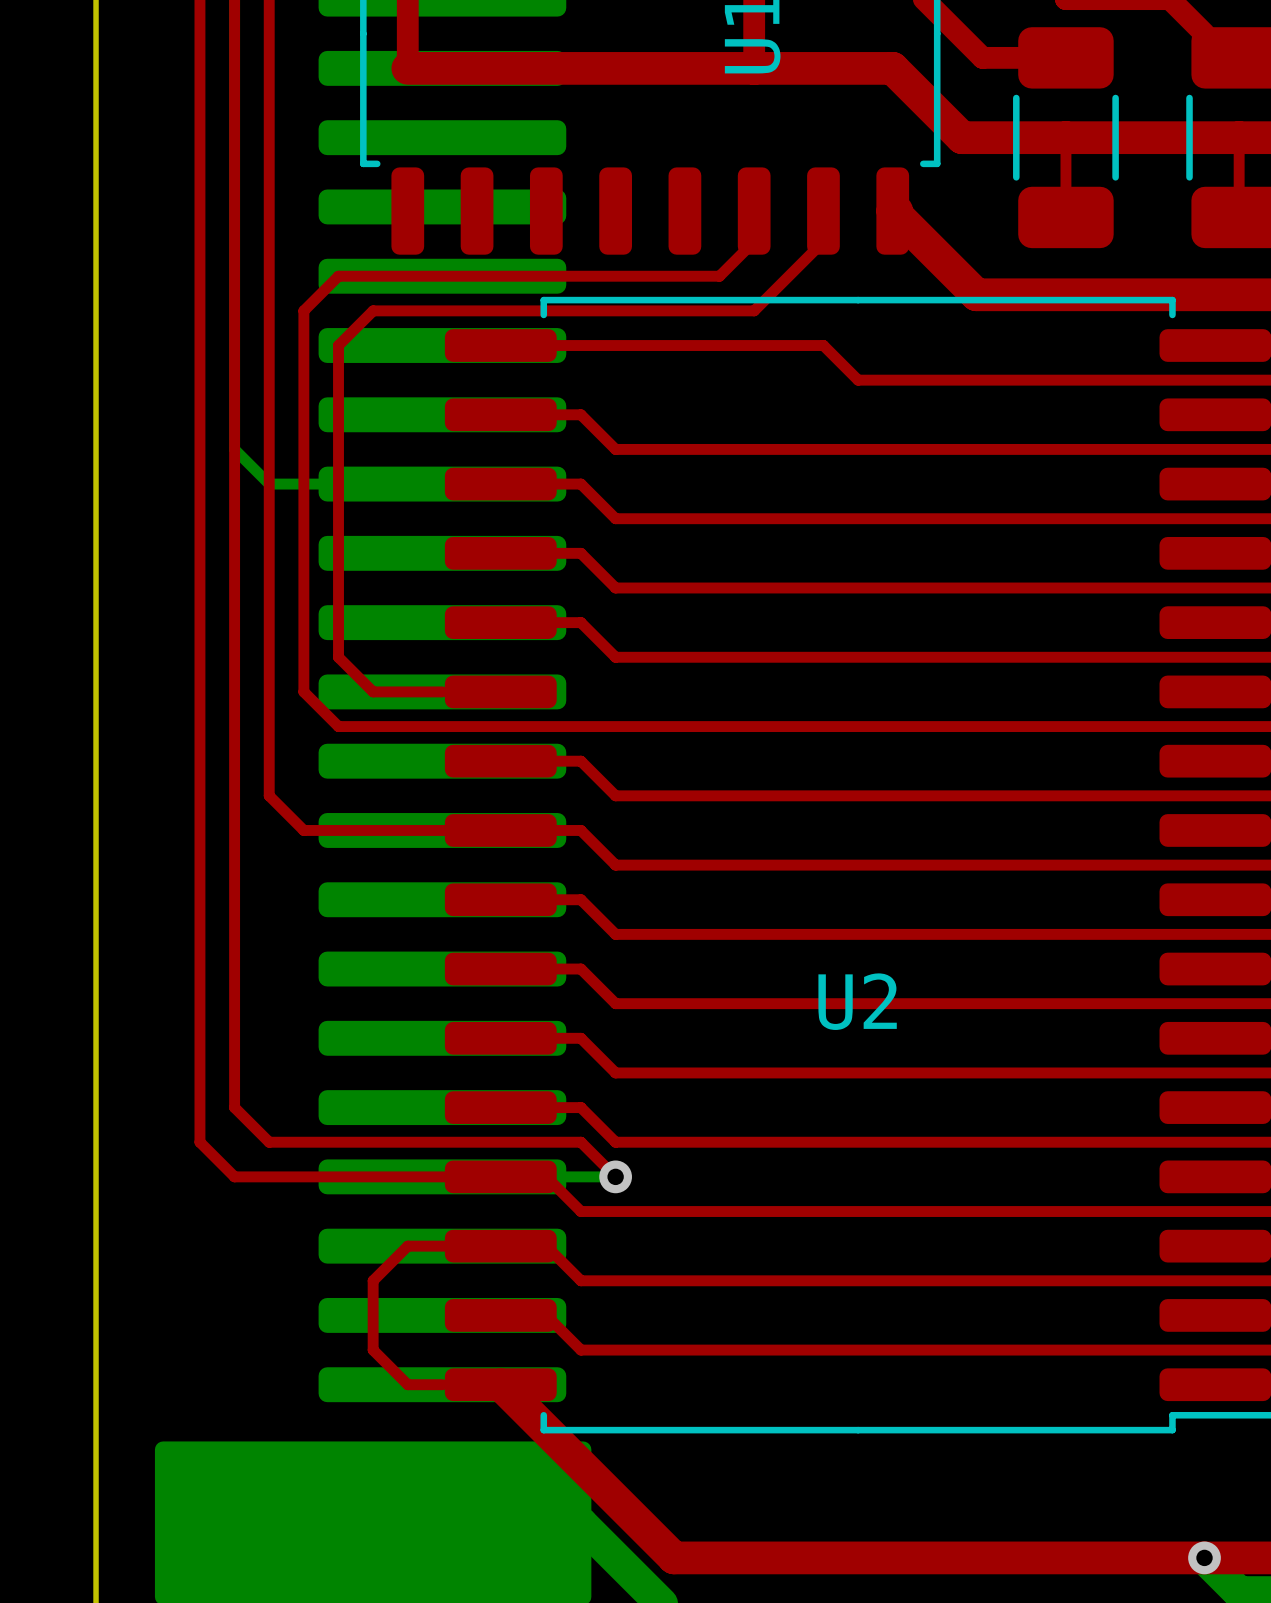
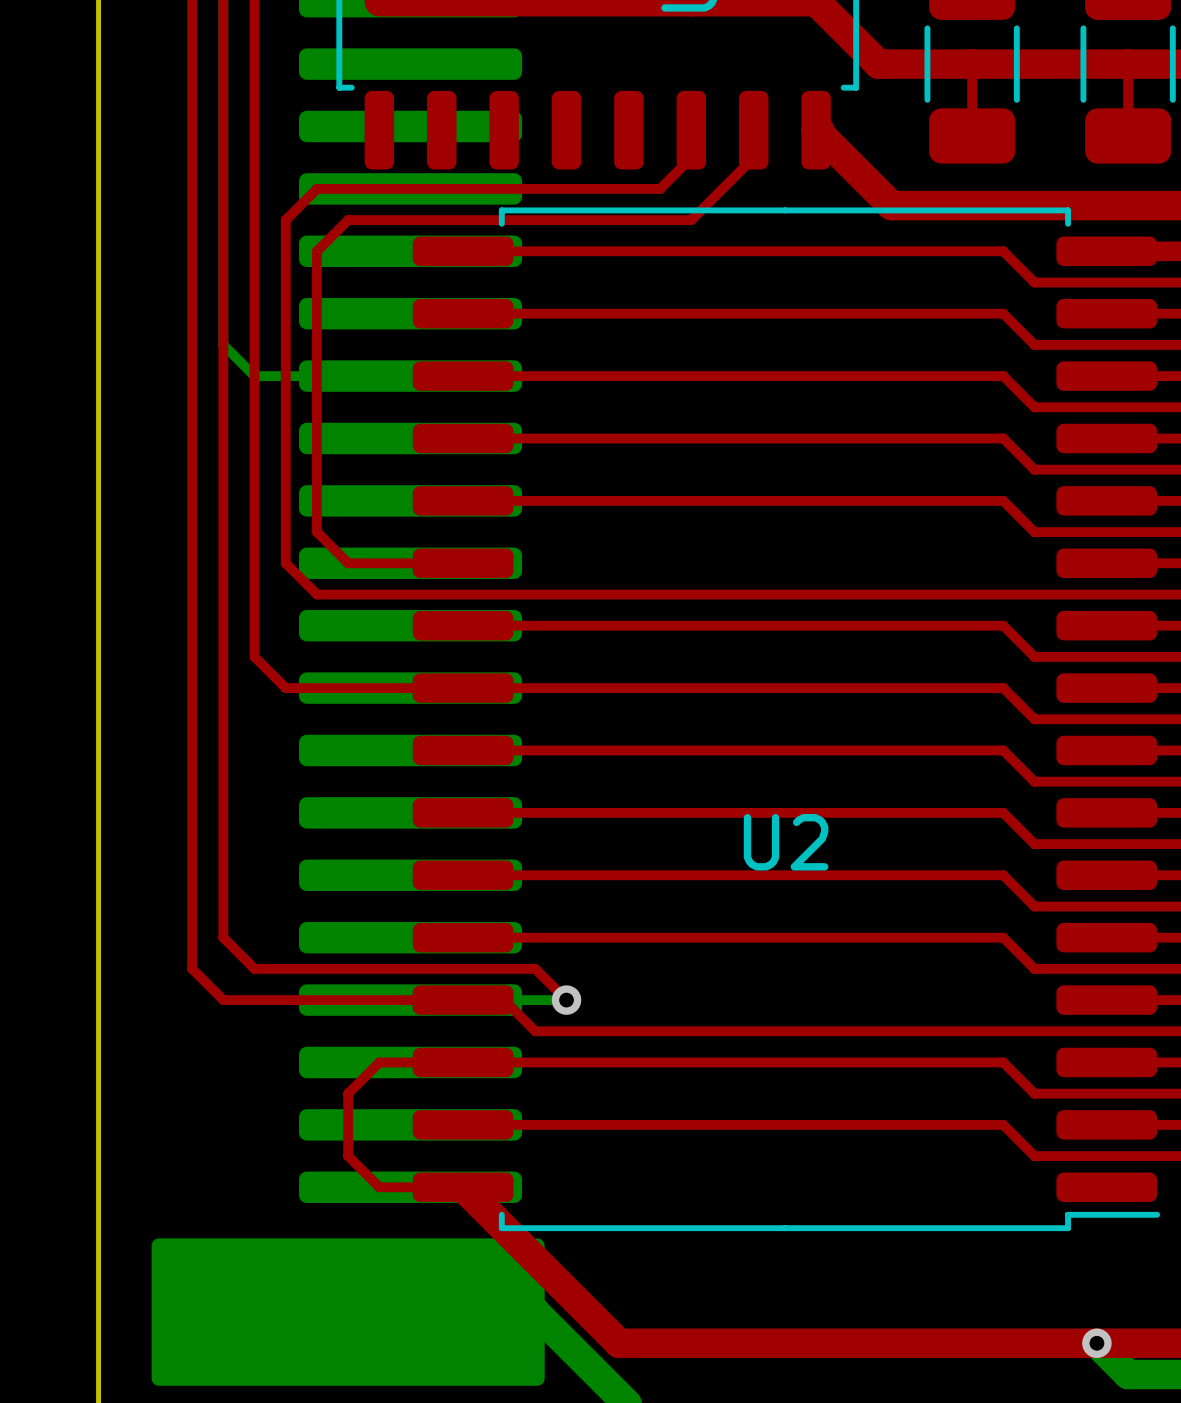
top track: (823, 345) (858, 380) (1135, 380) -> (753, 251) (1003, 251) (1034, 282)
top track: (580, 414) (615, 449) (1135, 449) -> (535, 313) (1003, 313) (1034, 344)
top track: (580, 484) (615, 518) (1135, 518) -> (535, 376) (1003, 376) (1034, 407)
top track: (580, 553) (615, 587) (1135, 587) -> (535, 438) (1003, 438) (1034, 469)
top track: (580, 622) (615, 657) (1135, 657) -> (535, 500) (1003, 500) (1034, 532)
top track: (580, 761) (615, 795) (1135, 795) -> (535, 625) (1003, 625) (1034, 656)
top track: (580, 830) (615, 865) (1135, 865) -> (535, 688) (1003, 688) (1034, 719)
top track: (580, 899) (615, 934) (1135, 934) -> (535, 750) (1003, 750) (1034, 781)
top track: (580, 969) (615, 1003) (1135, 1003) -> (535, 812) (1003, 812) (1034, 844)
top track: (580, 1038) (615, 1072) (1135, 1072) -> (535, 875) (1003, 875) (1034, 906)
top track: (580, 1107) (615, 1142) (1135, 1142) -> (535, 937) (1003, 937) (1034, 968)
top track: (546, 1246) (580, 1280) (1135, 1280) -> (504, 1062) (1003, 1062) (1034, 1093)
top track: (546, 1315) (580, 1350) (1135, 1350) -> (504, 1124) (1003, 1124) (1034, 1156)

